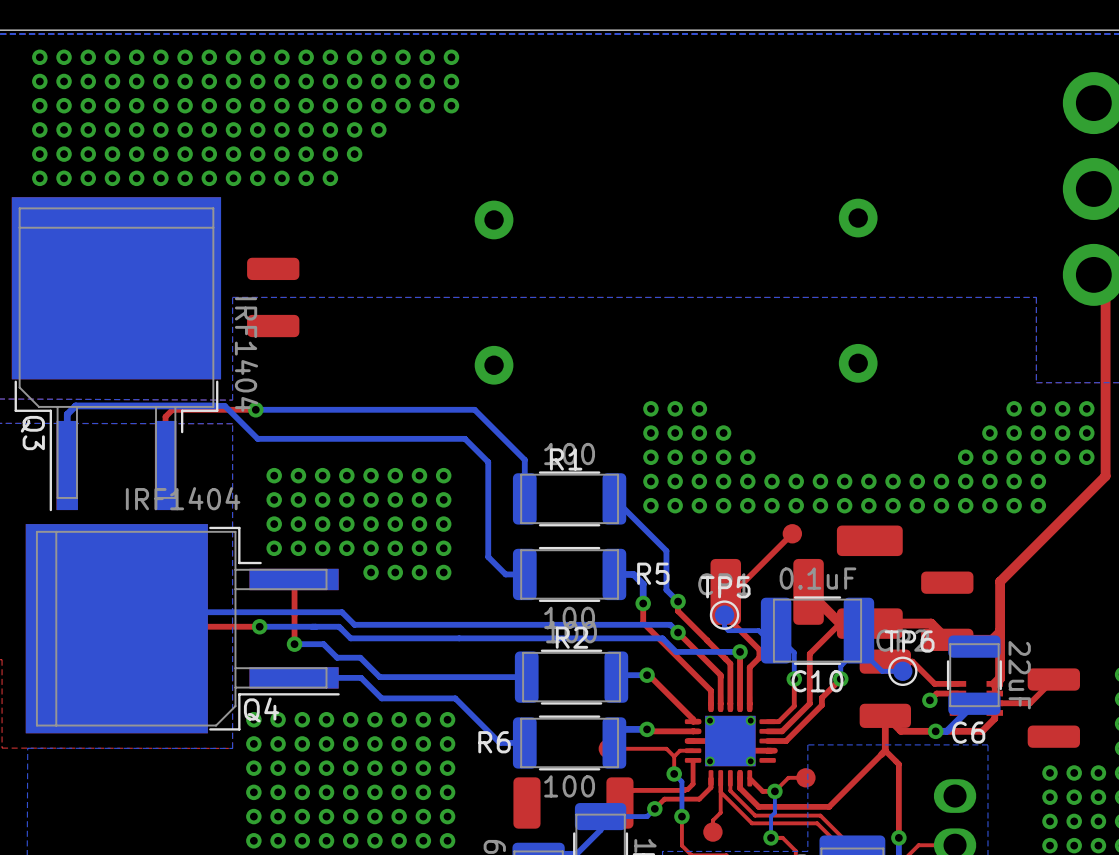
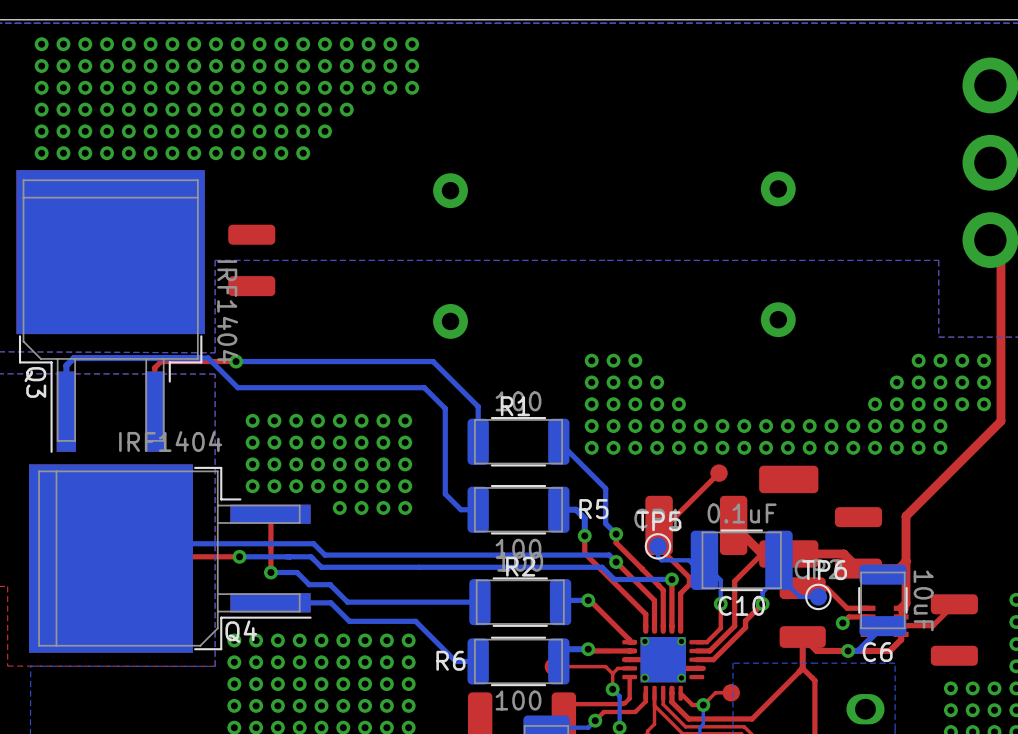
C6 value: 22uF (1019, 675) -> 10uF (923, 600)

